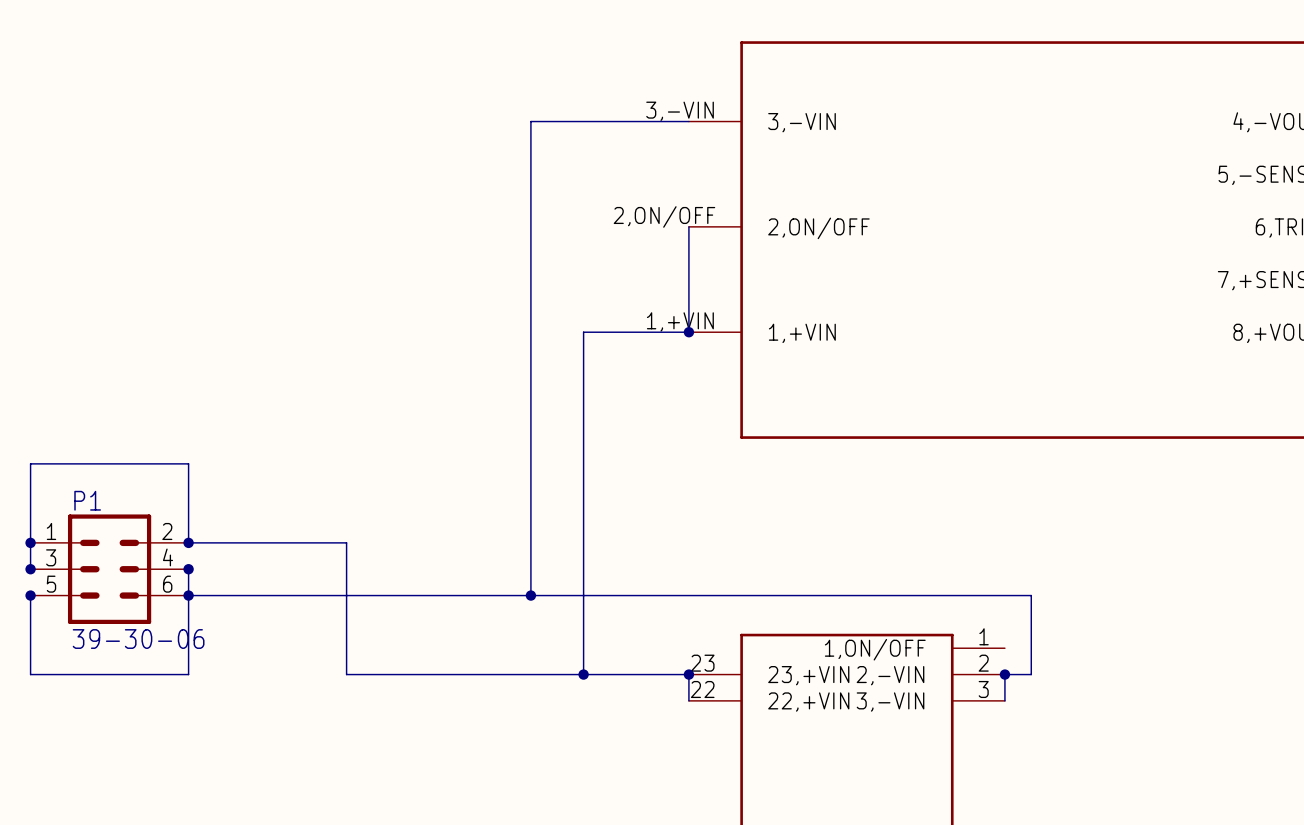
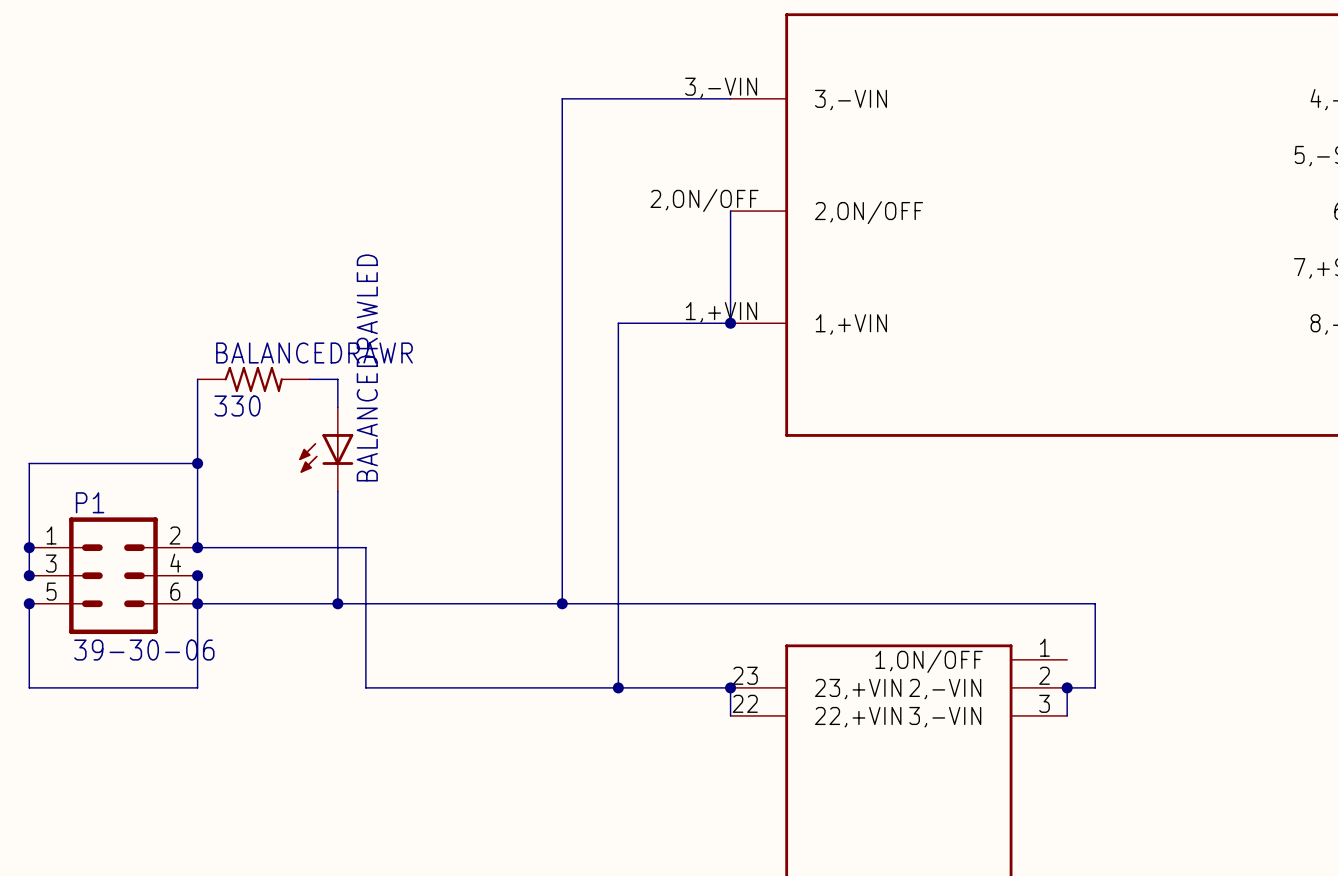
wire: none -> (197, 379) (197, 463)
BALANCEDRAWR: none -> 330 (253, 379)
wire: none -> (309, 379) (337, 379) (337, 407)
BALANCEDRAWLED: none -> (326, 449)
junction: none -> (197, 463)
wire: none -> (337, 491) (337, 603)
junction: none -> (337, 603)

